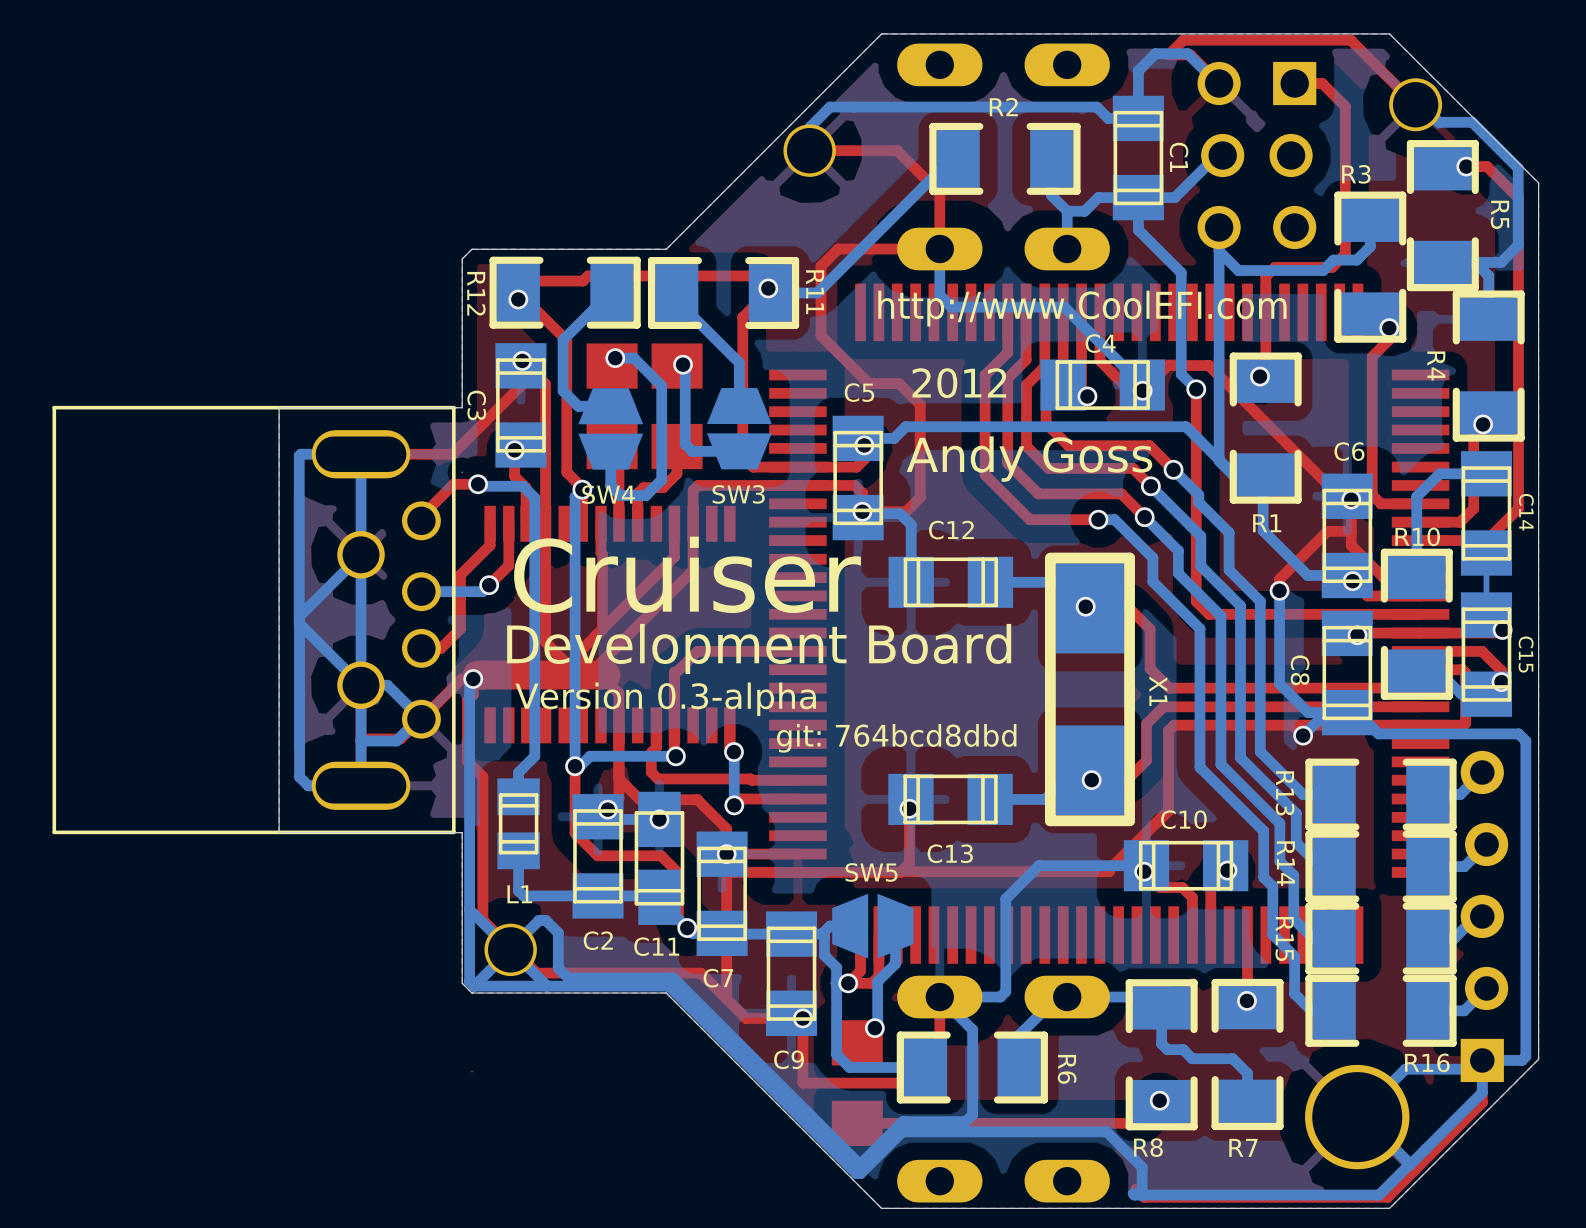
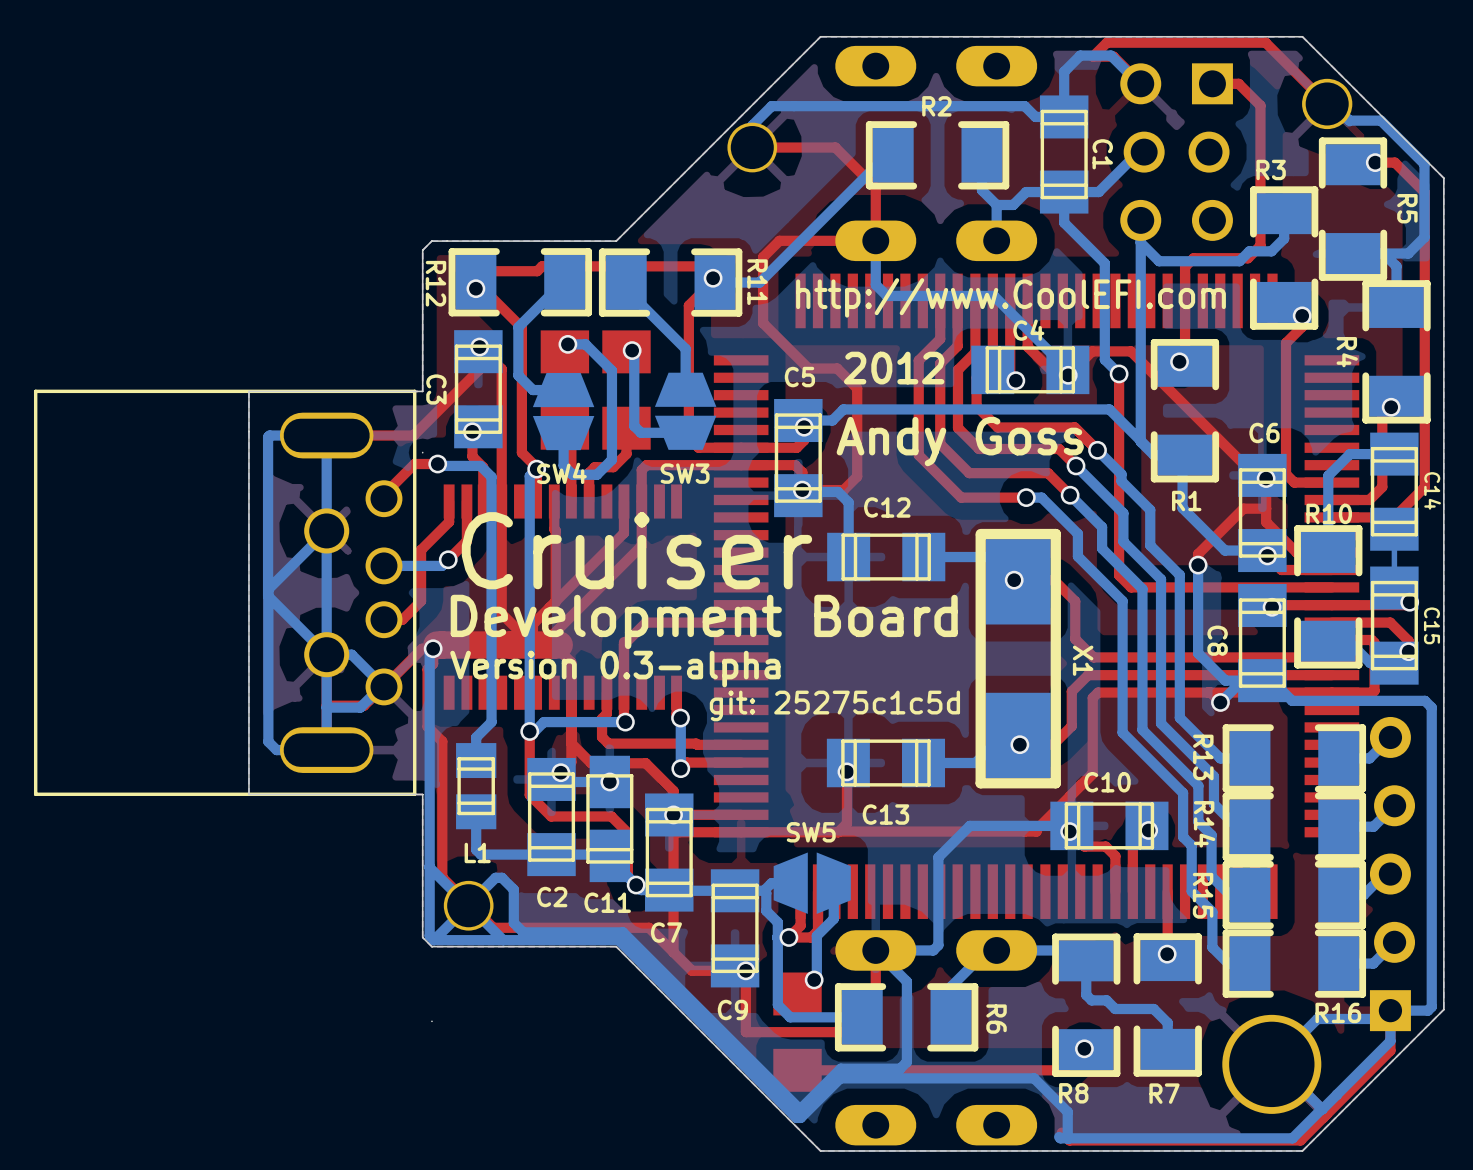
text: git: 764bcd8dbd (896, 738) -> git: 25275c1c5d (834, 705)

